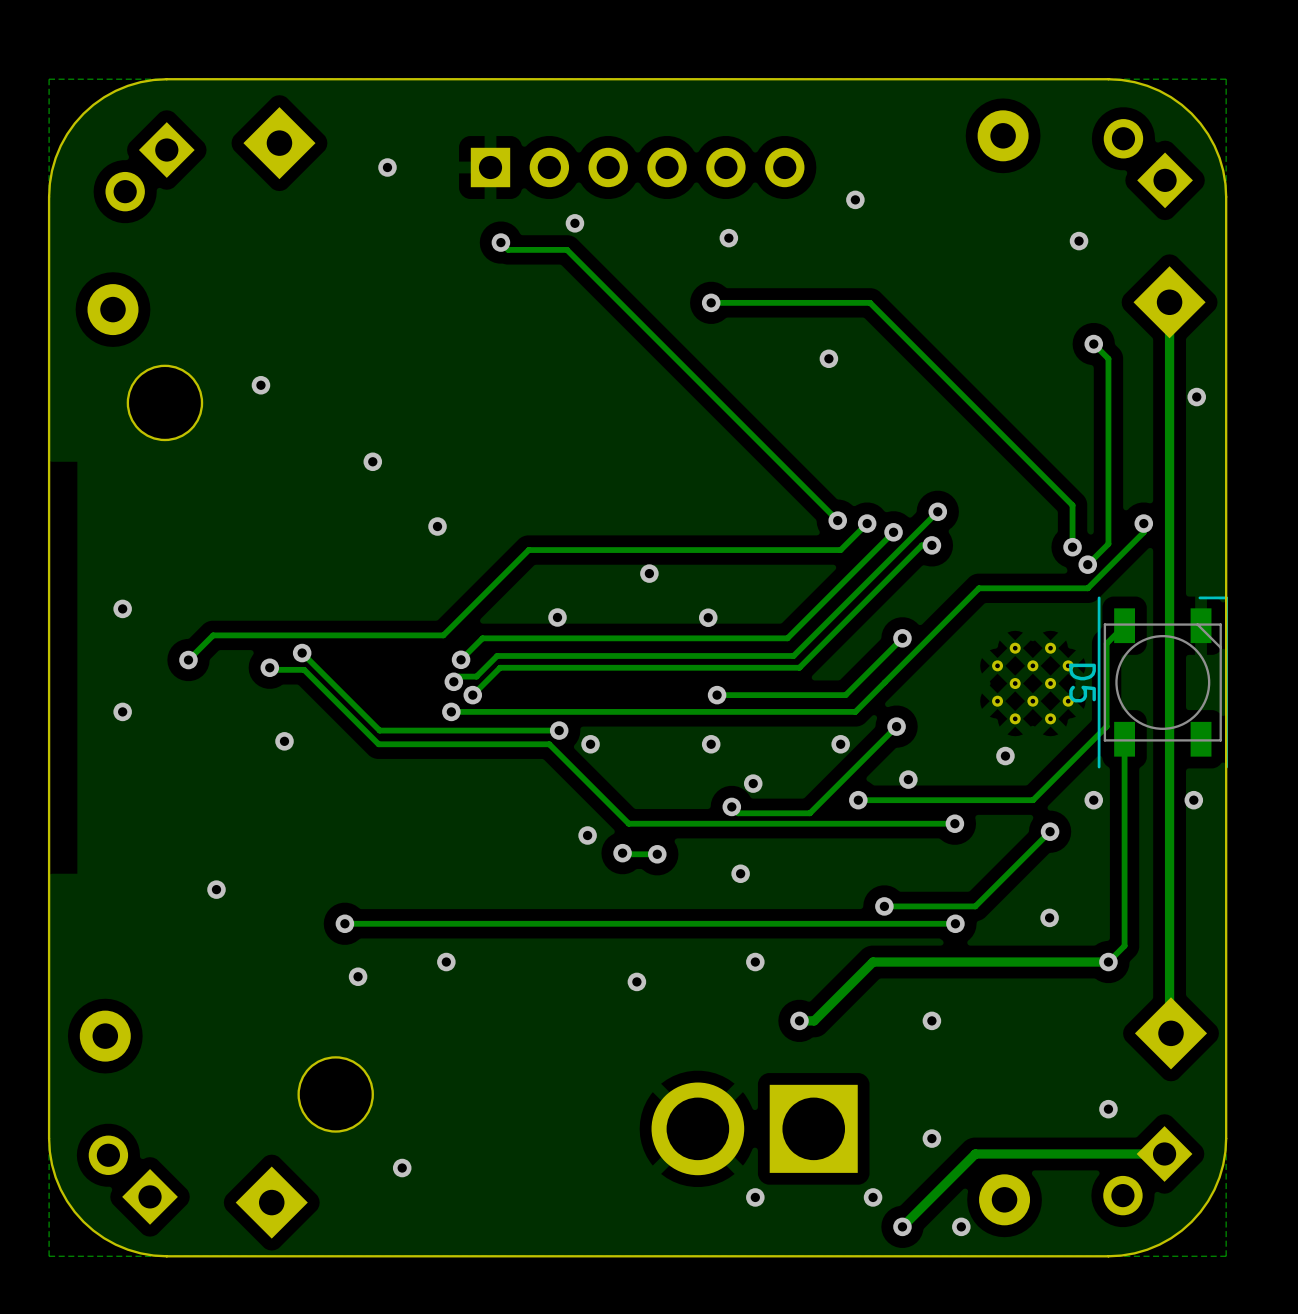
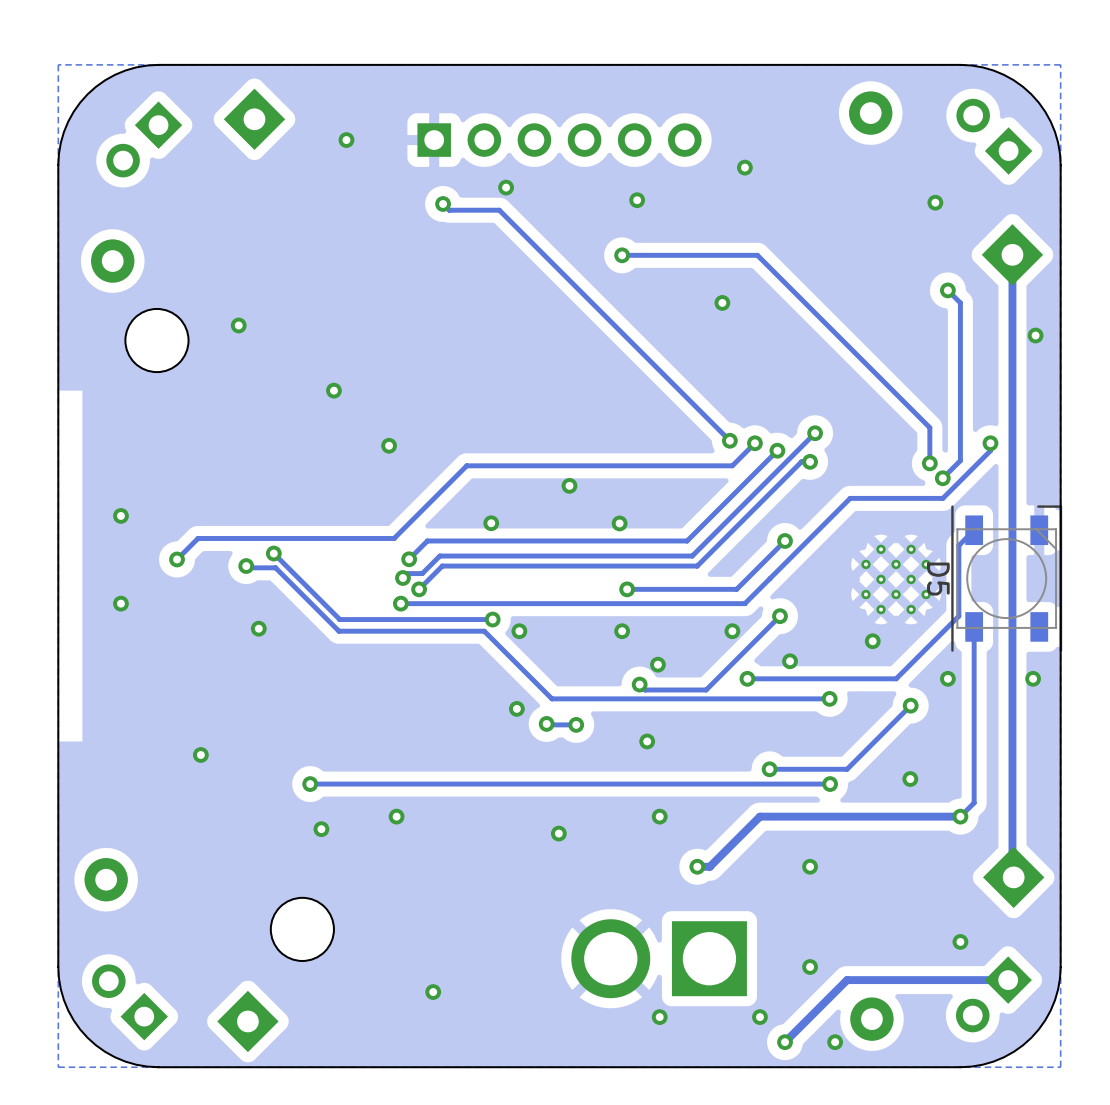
via position: (402, 1168) -> (433, 992)

